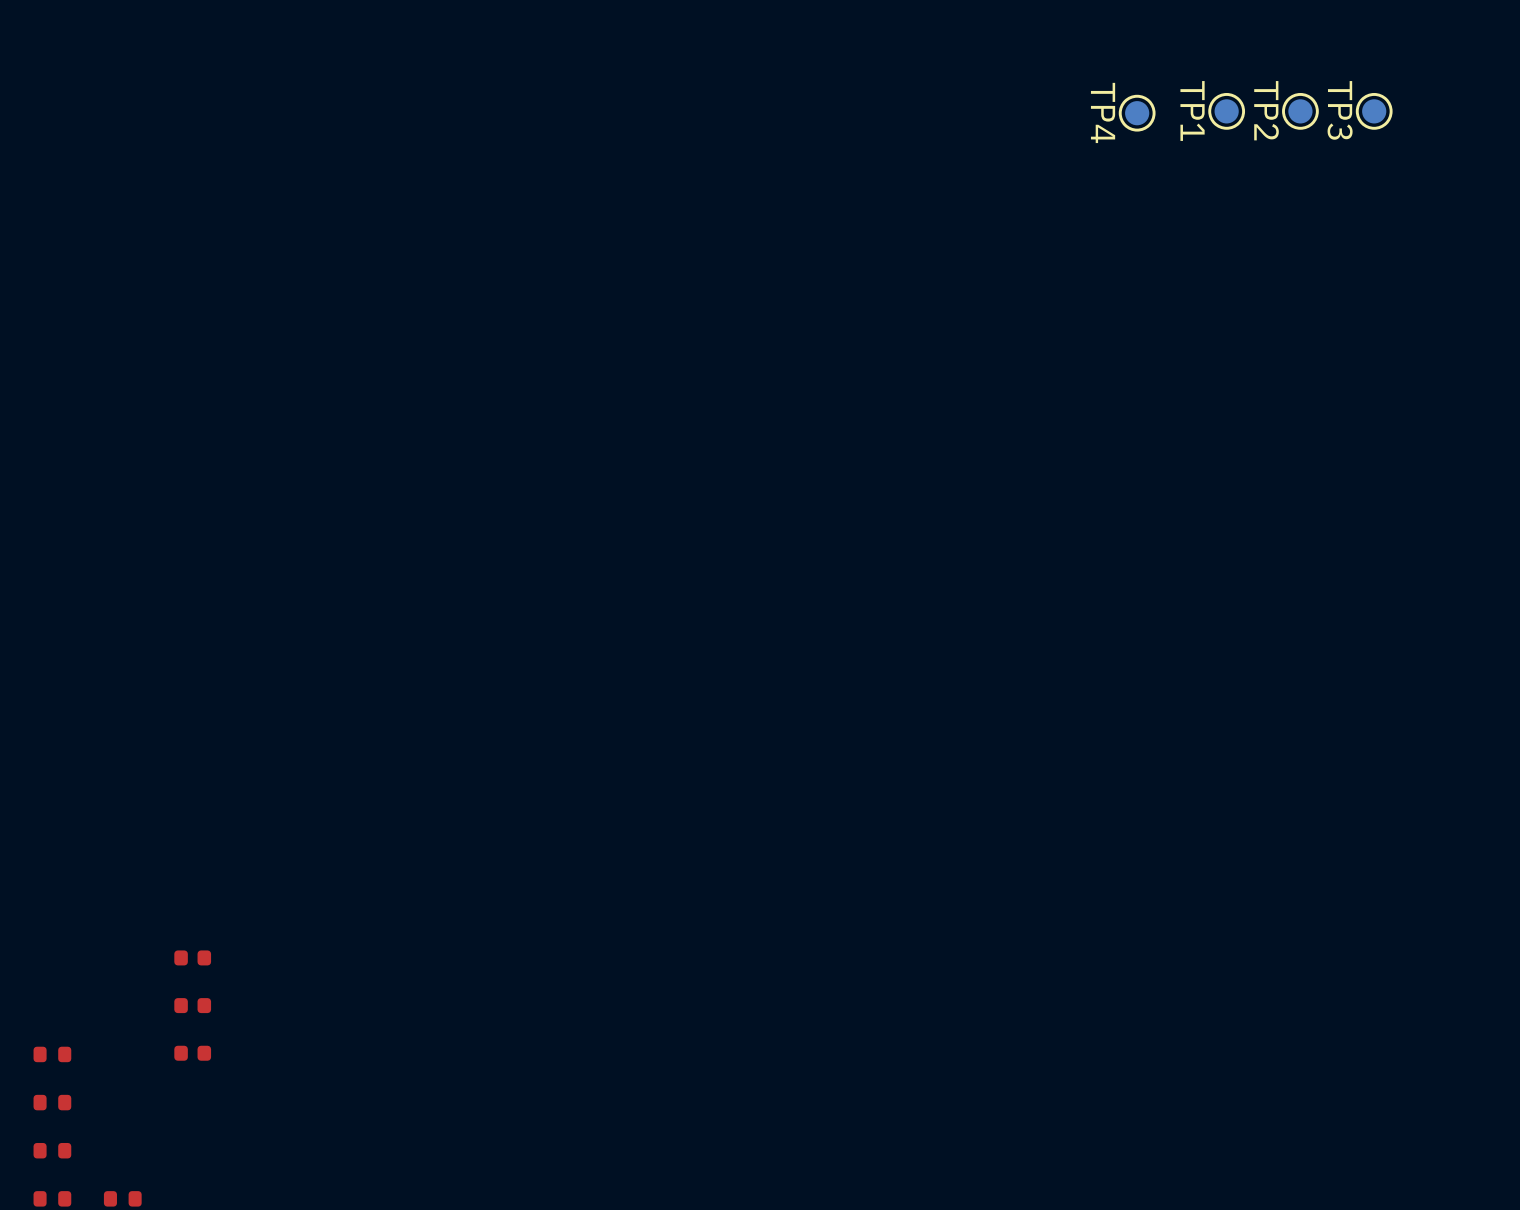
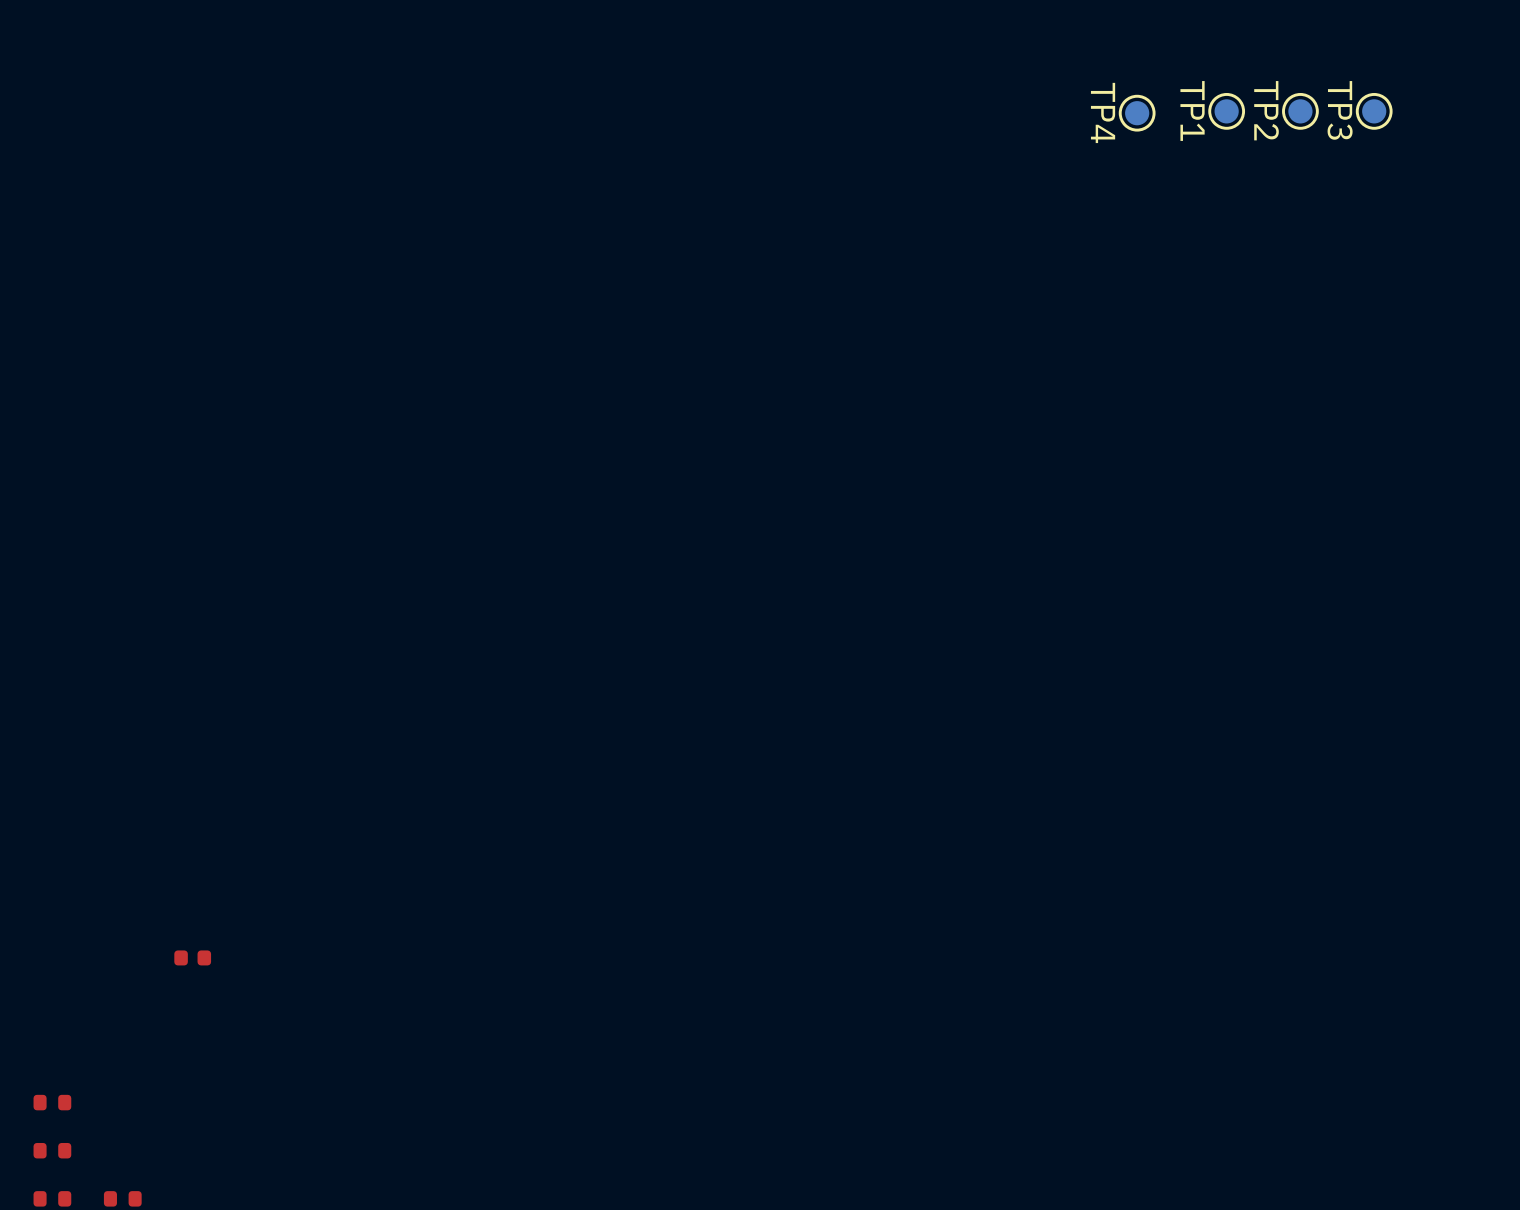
part: (192, 1005) -> none
part: (192, 1053) -> none
part: (52, 1054) -> none

